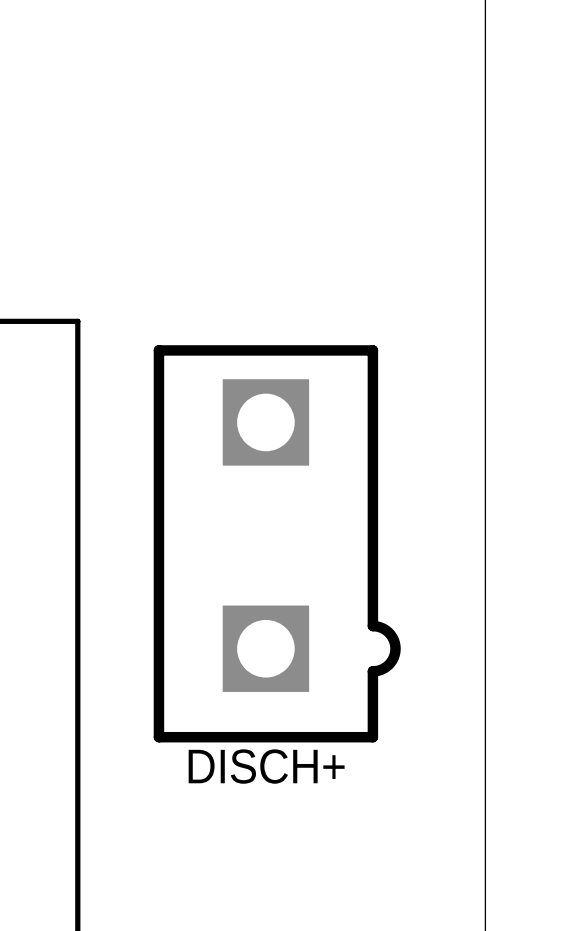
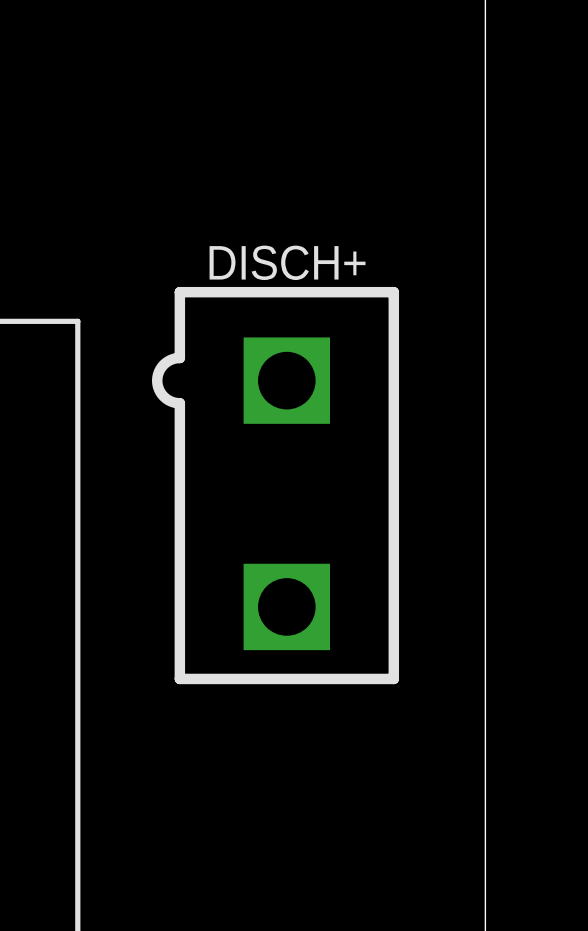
DISCH+ rotation: 0° (277, 543) -> 180° (275, 485)

